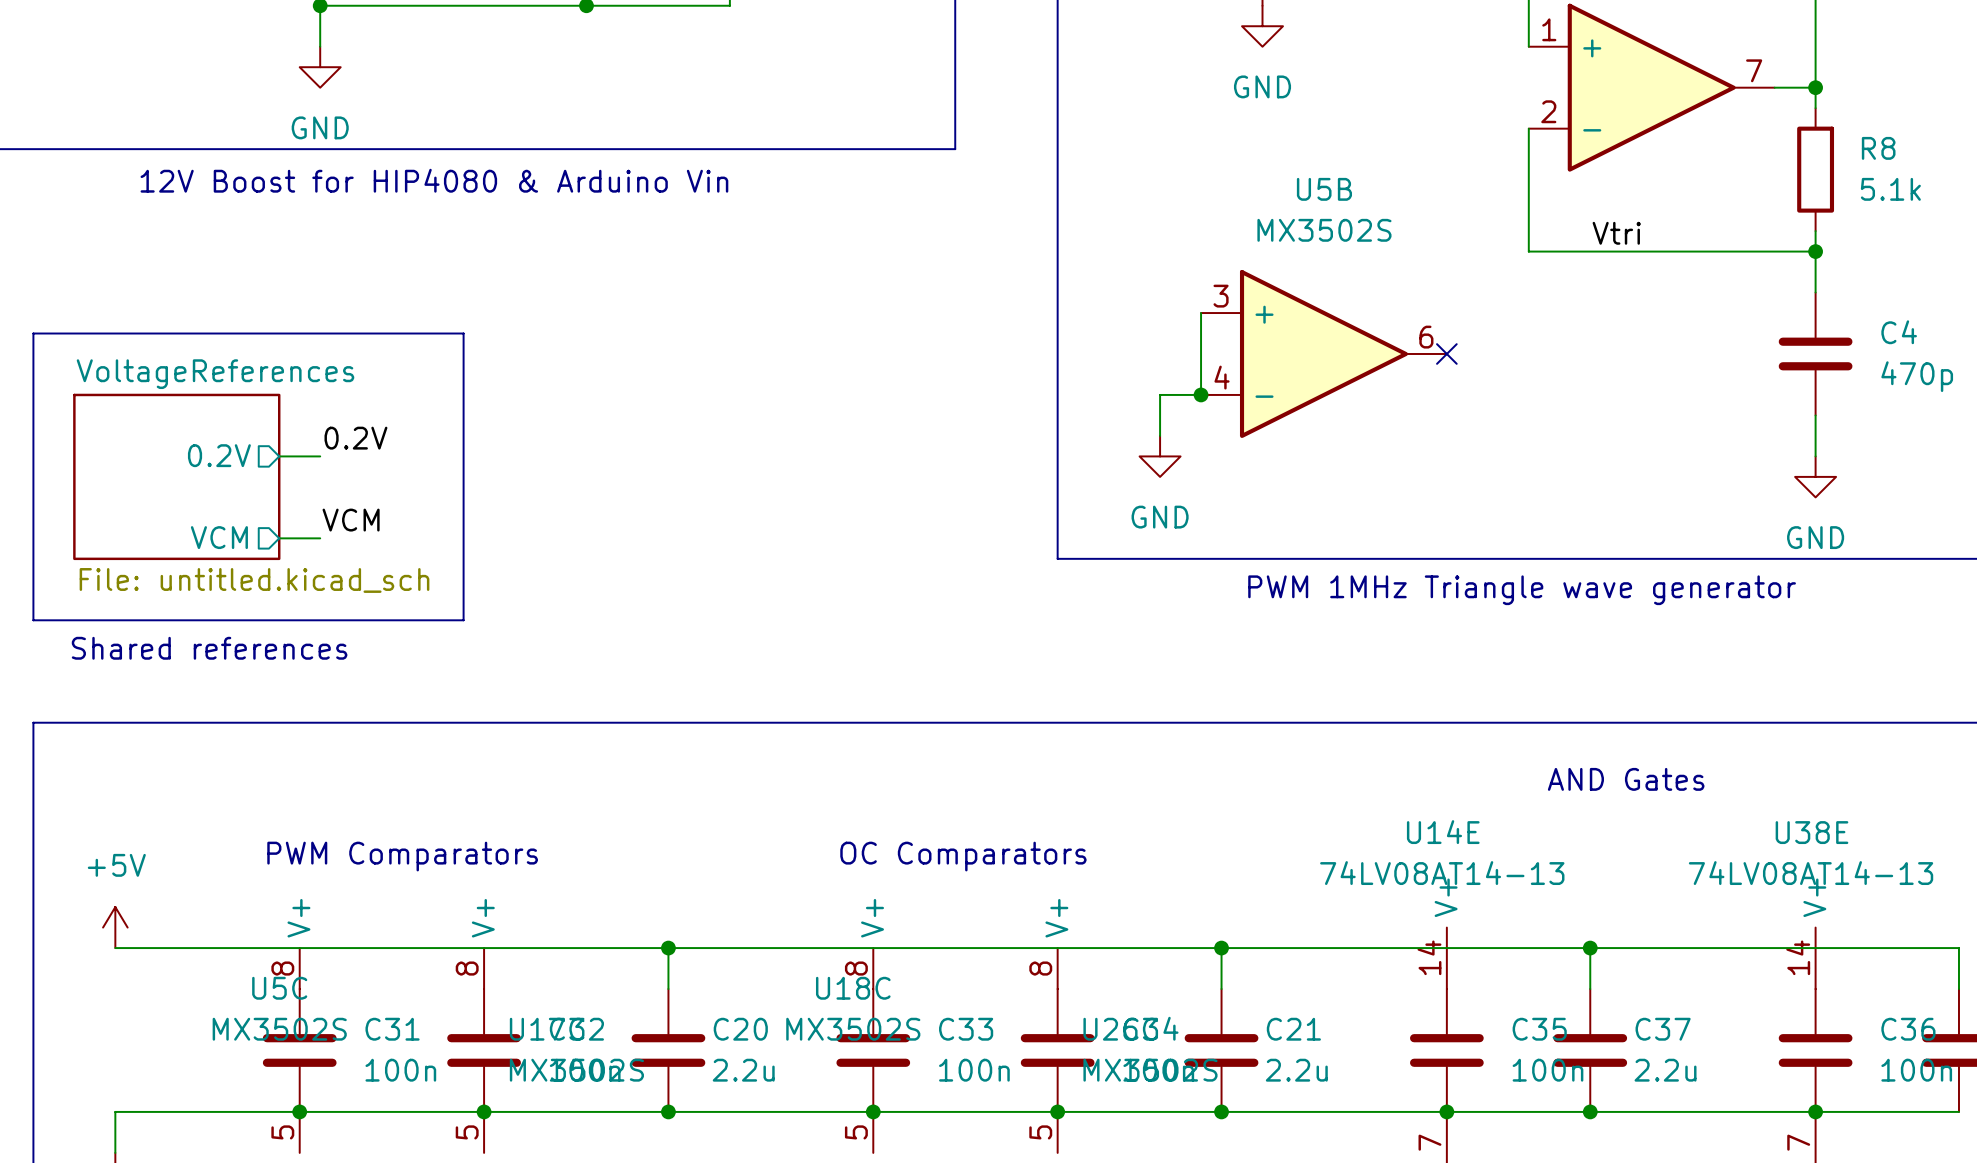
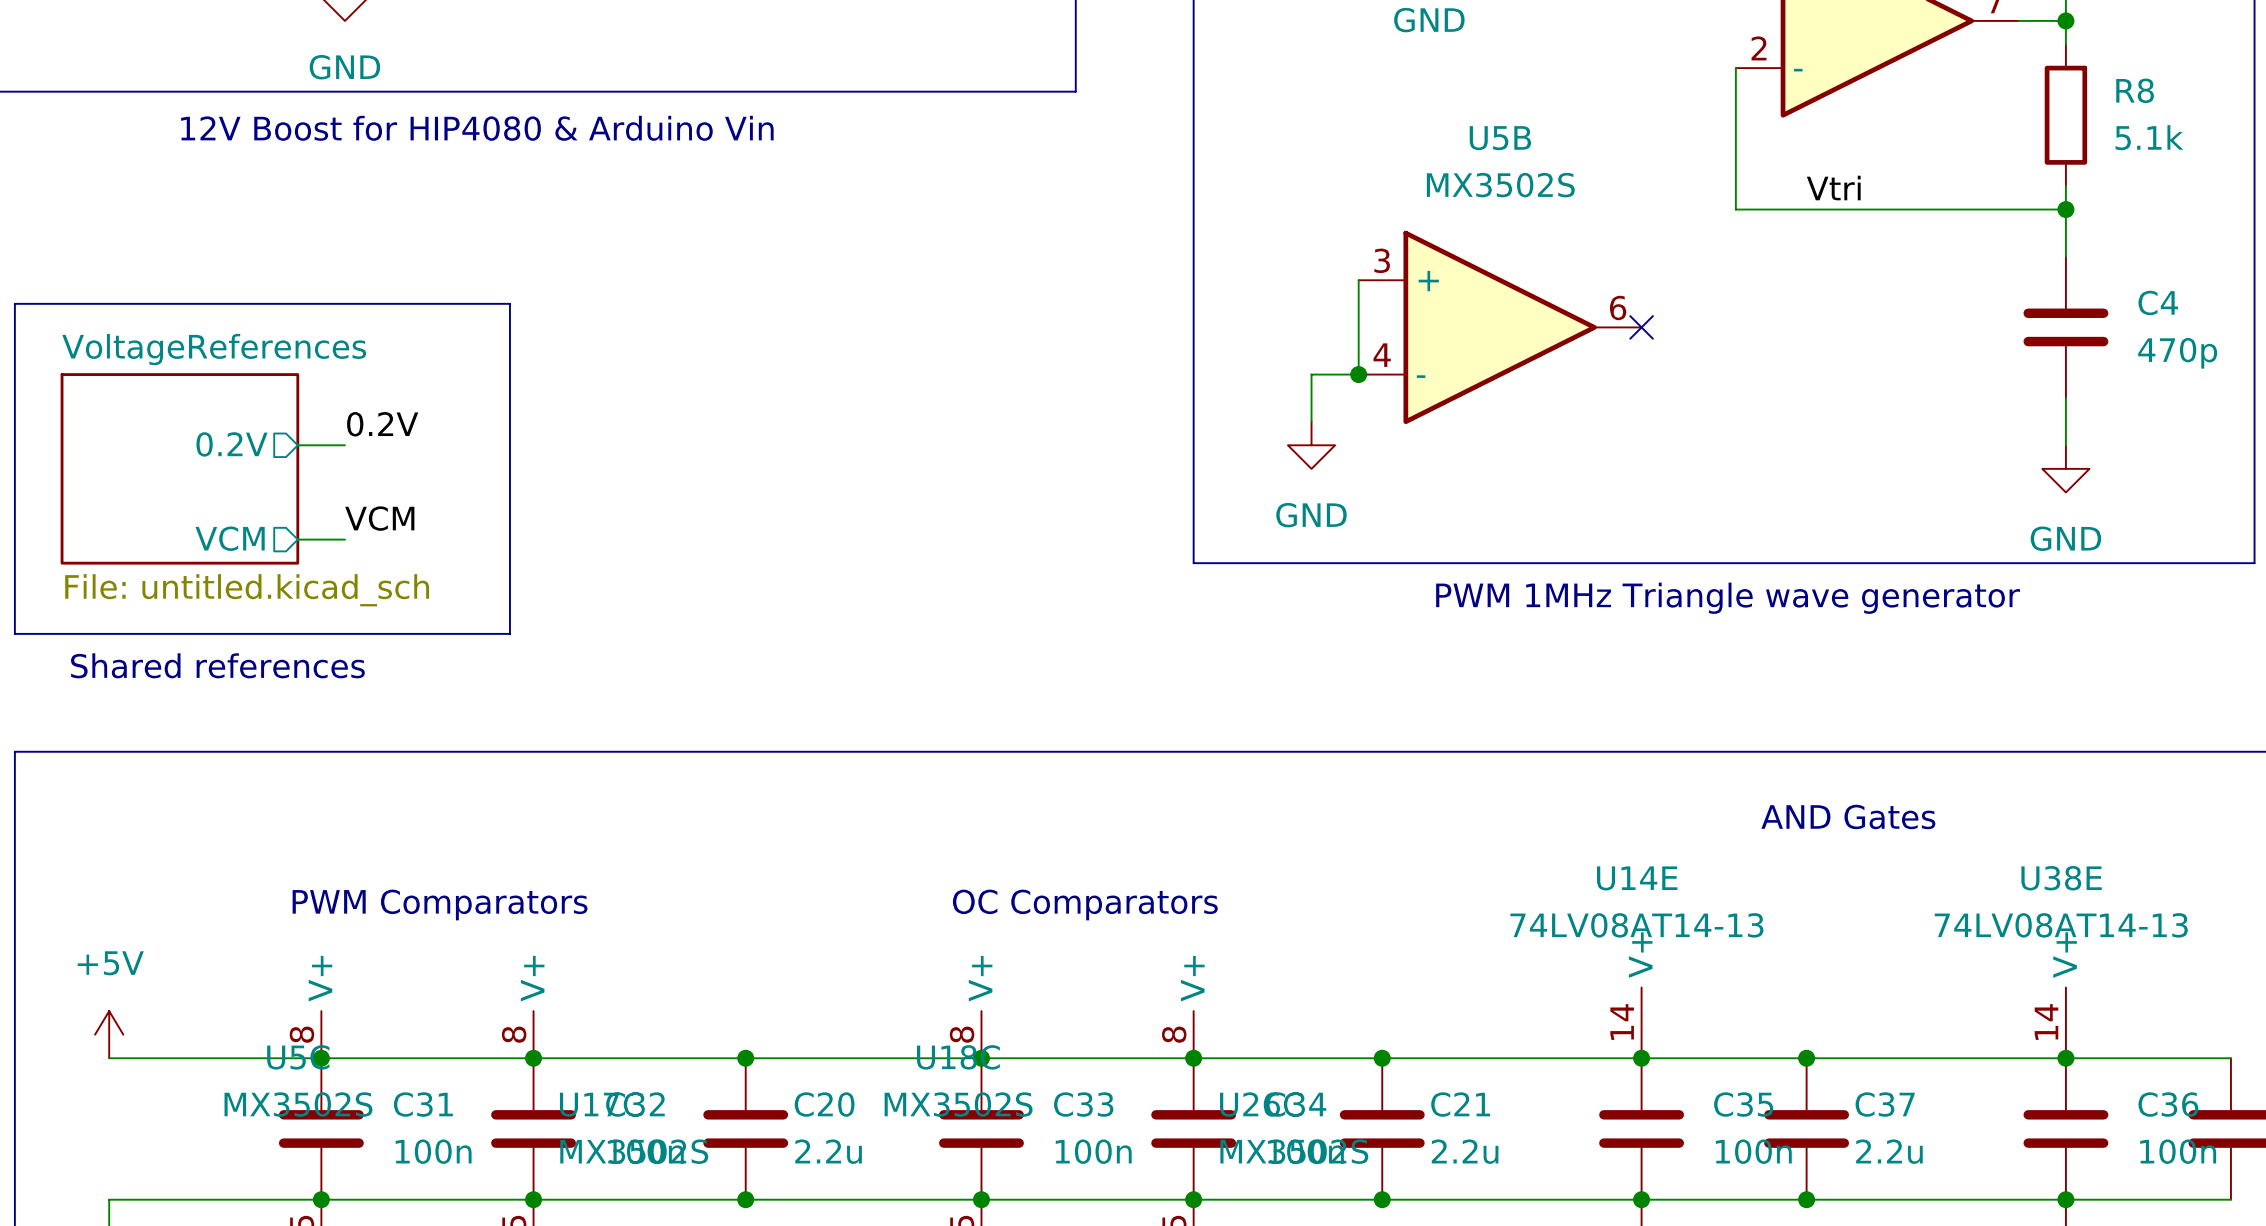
power symbol position: +5V (115, 927) -> +5V (109, 1034)
wire: (115, 948) (1958, 948) (1958, 989) -> (109, 1058) (2230, 1058)
wire: (668, 948) (668, 989) -> none
junction position: (668, 948) -> (745, 1058)
wire: (1221, 948) (1221, 989) -> none
junction position: (1221, 948) -> (1382, 1058)
wire: (1590, 948) (1590, 989) -> none
junction position: (1590, 948) -> (1806, 1058)
junction: none -> (321, 1058)
junction: none -> (533, 1058)
junction: none -> (981, 1058)
junction: none -> (1193, 1058)
junction: none -> (1641, 1058)
junction: none -> (2065, 1058)

